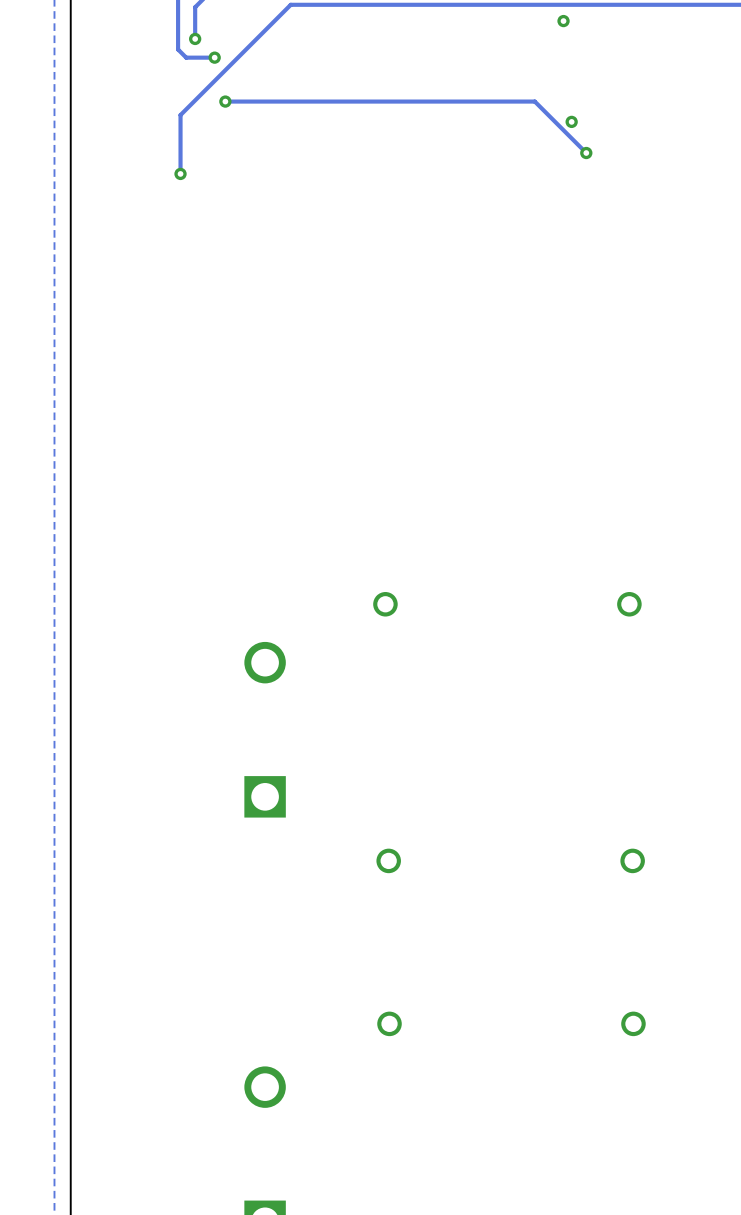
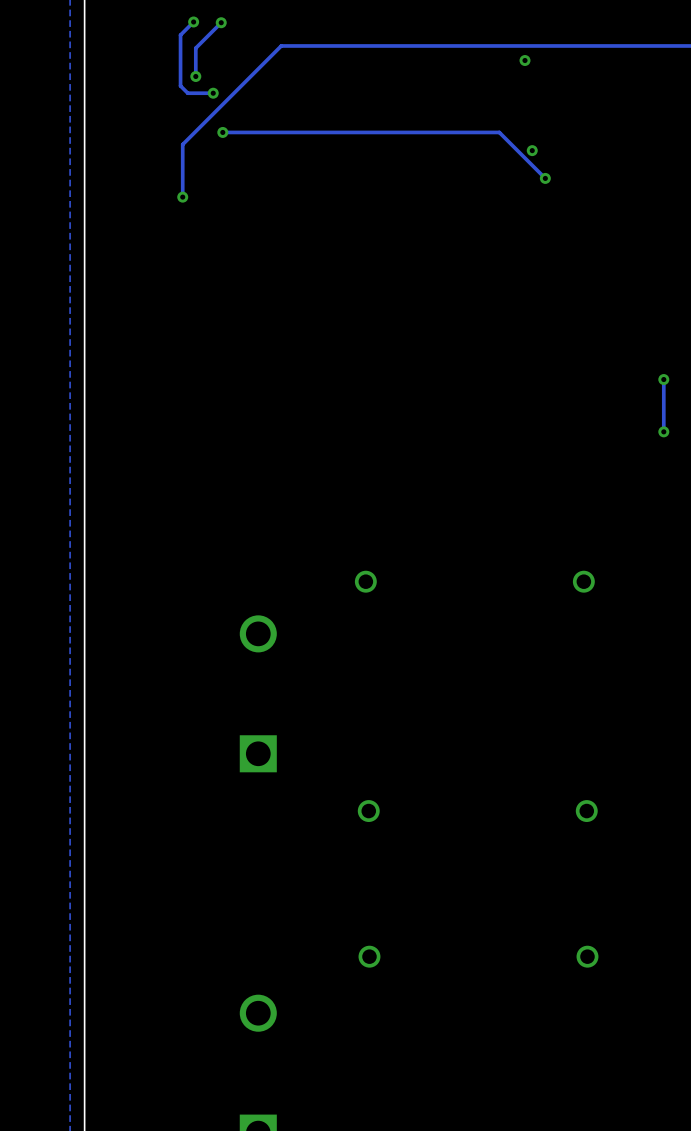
track: none -> (663, 379) (663, 431)
via: none -> (663, 379)
via: none -> (663, 431)

